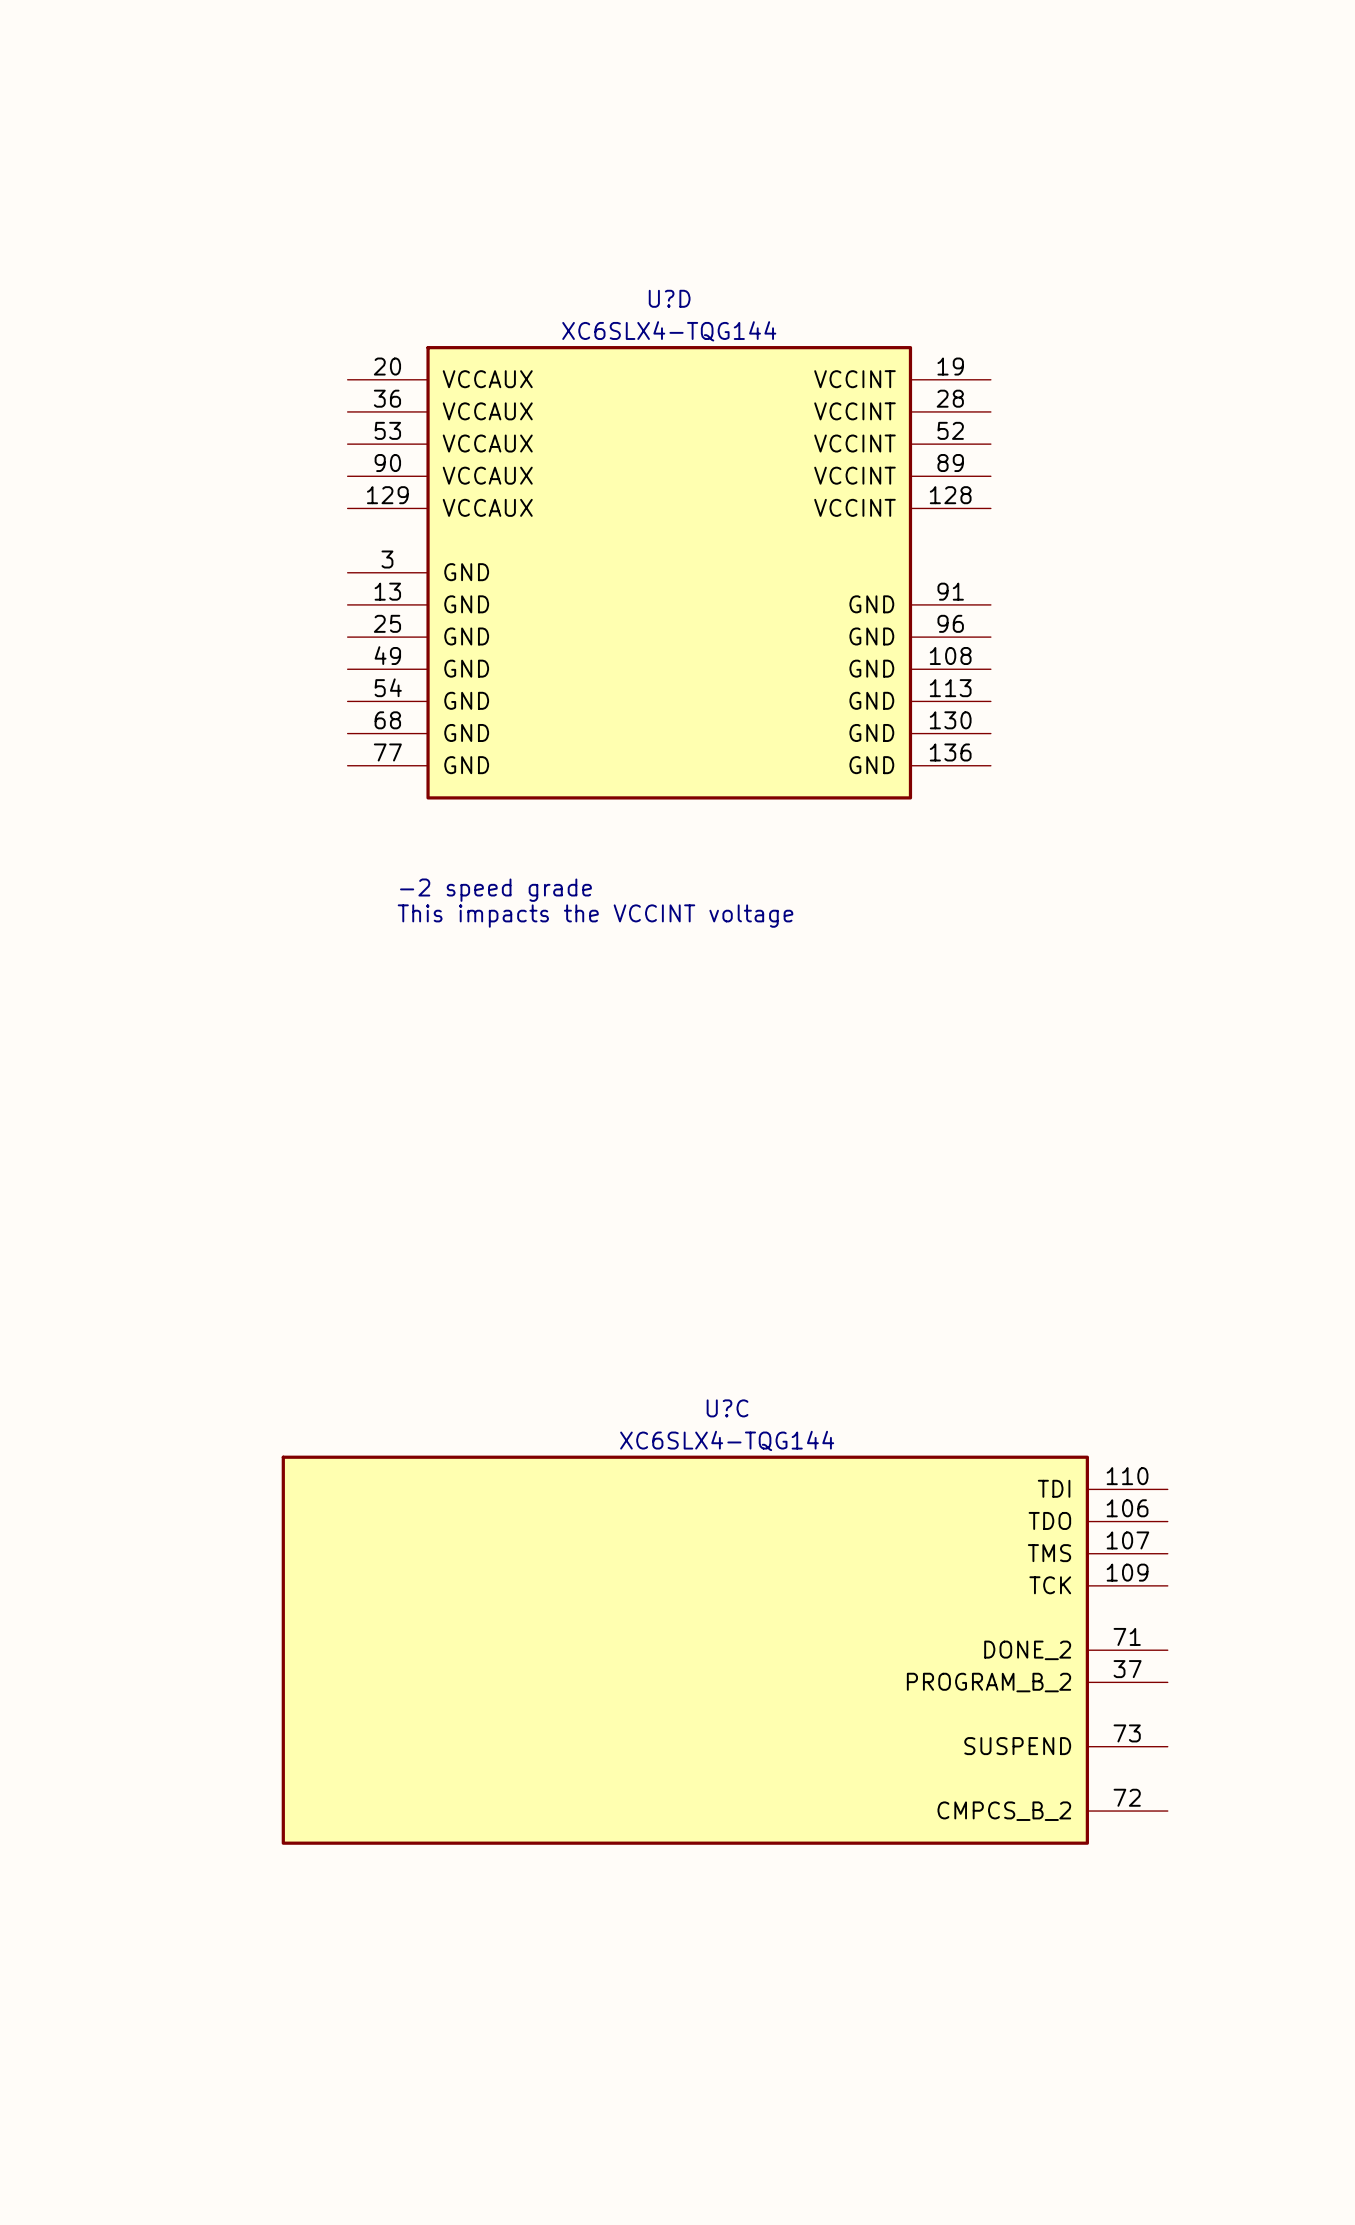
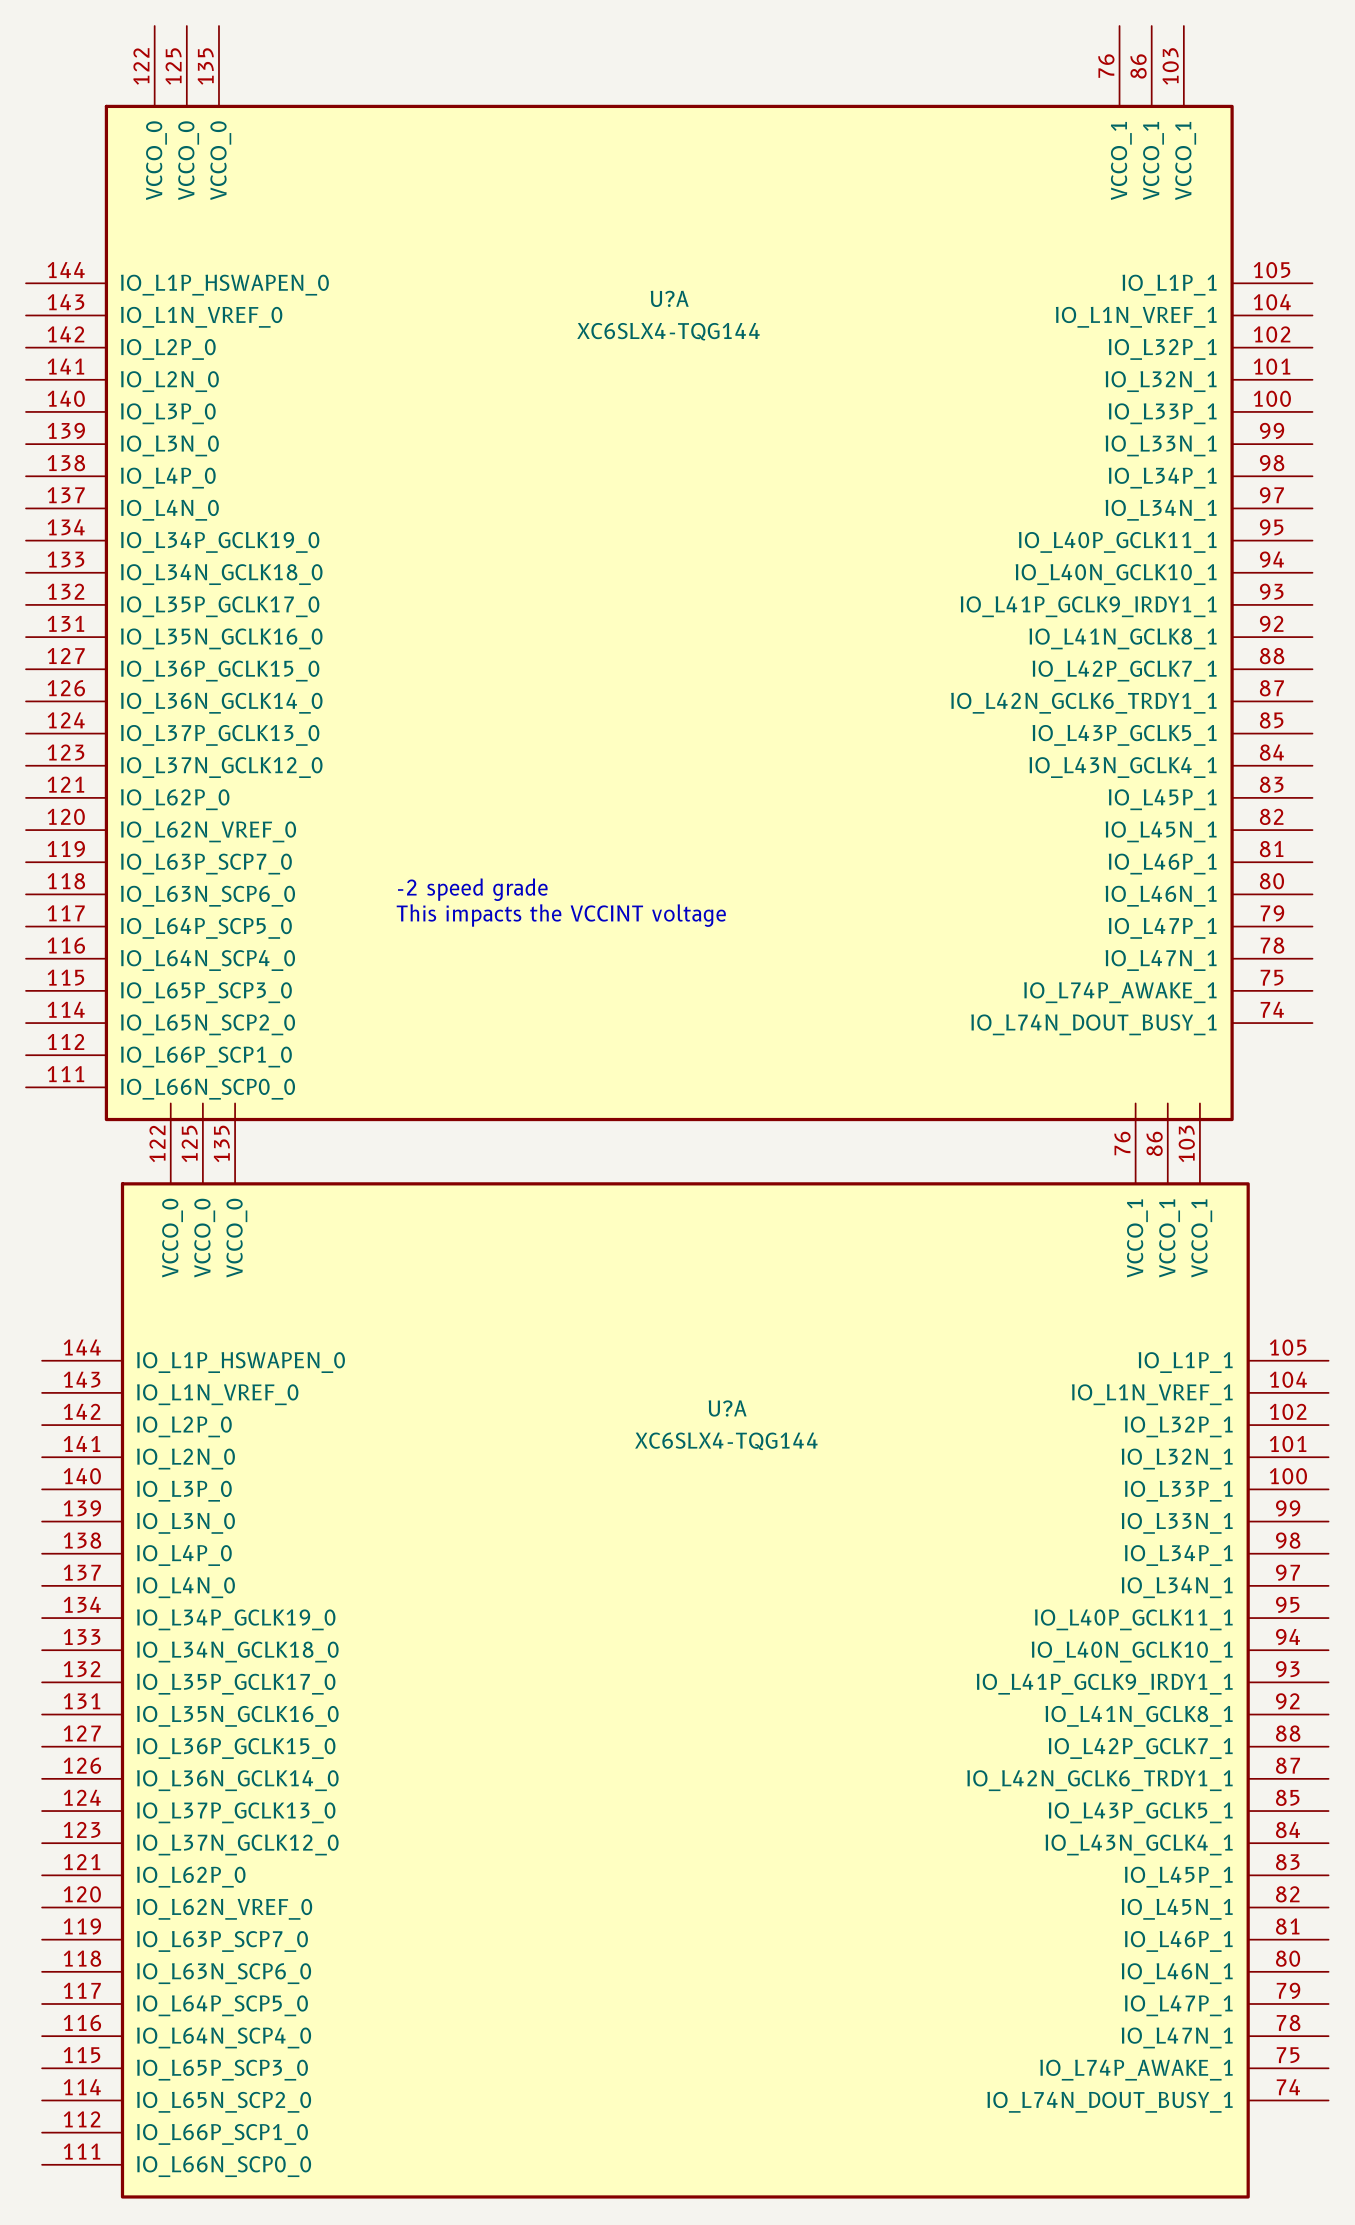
U?D: XC6SLX4-TQG144 (669, 572) -> none
U?A: none -> XC6SLX4-TQG144 (669, 573)
U?C: XC6SLX4-TQG144 (724, 1650) -> none
U?A: none -> XC6SLX4-TQG144 (685, 1651)

